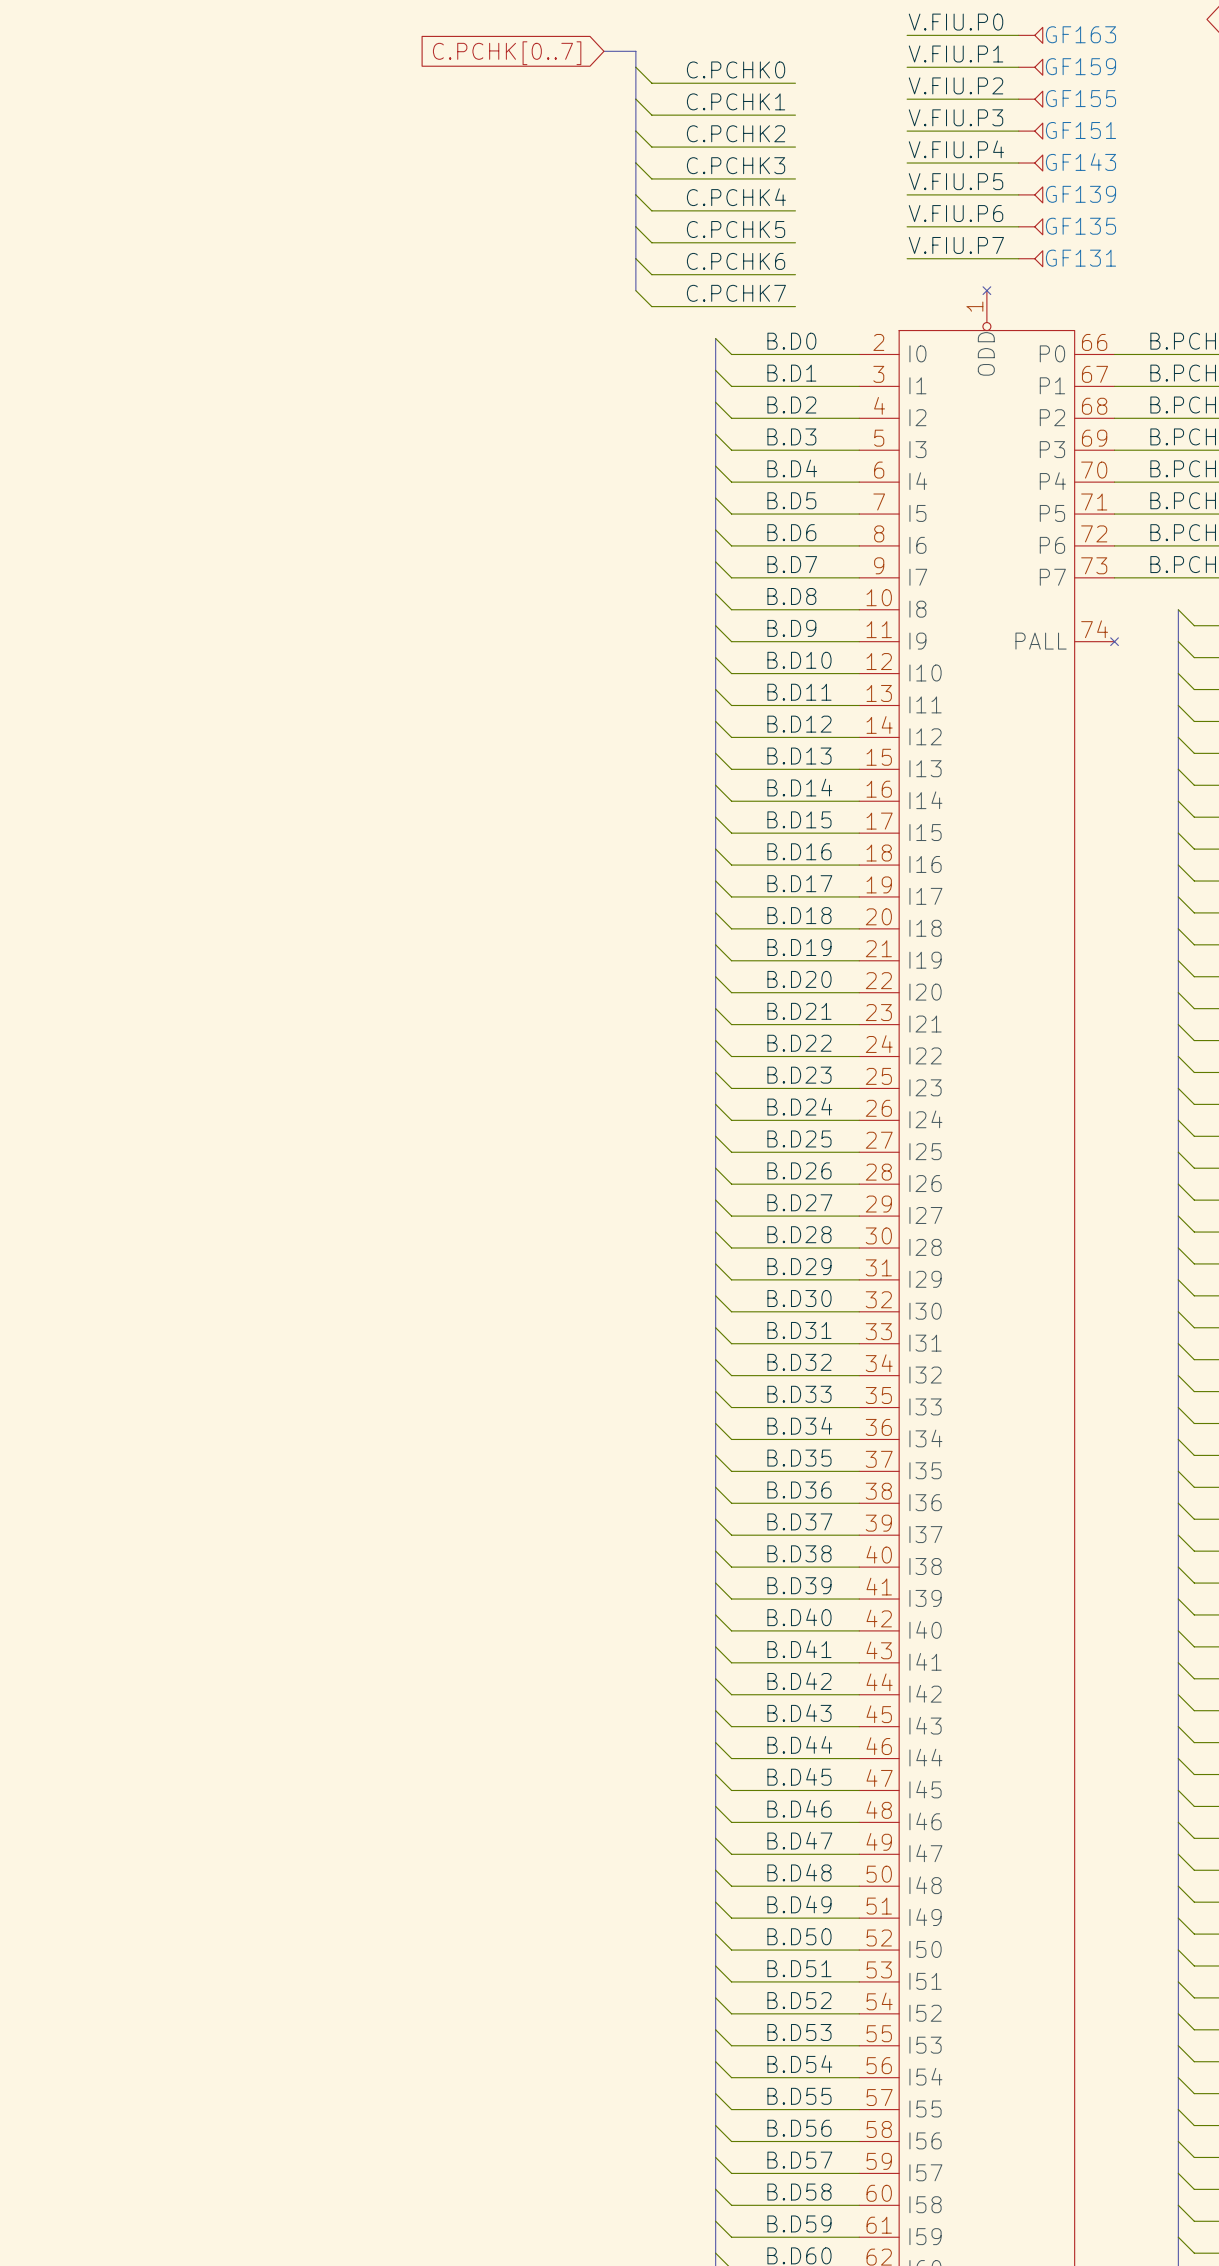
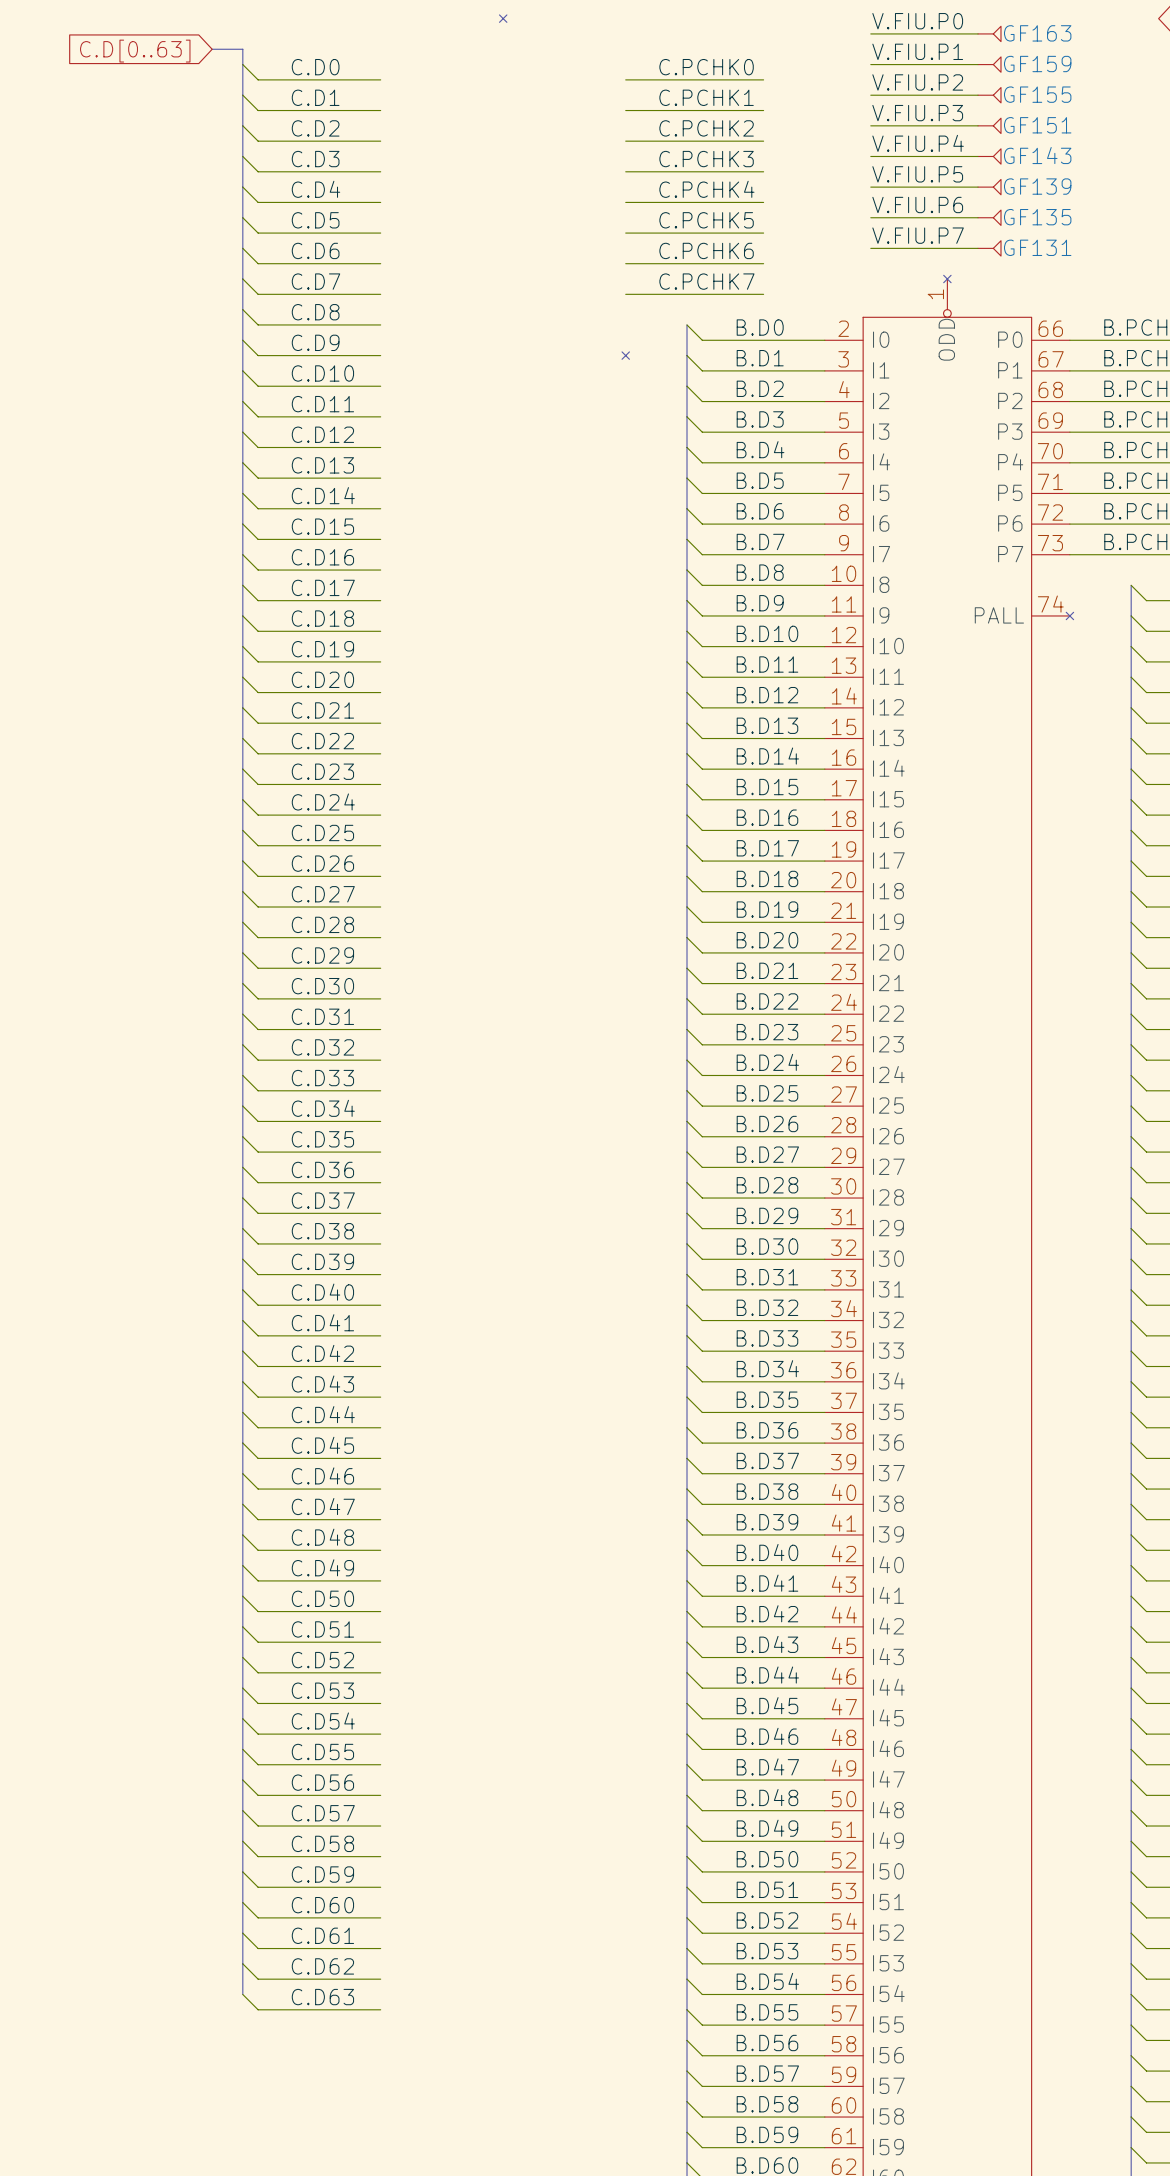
no-connect mark: none -> (503, 18)
bus: none -> (212, 49) (242, 49) (242, 1994)
bus: (603, 51) (635, 51) (635, 290) -> none
global label: none -> C.D[0..63] (135, 51)
global label: C.PCHK[0..7] (507, 53) -> none
wire: none -> (242, 64) (258, 79) (380, 79)
wire: (635, 67) (651, 83) -> none
label: none -> C.D0 (315, 67)
wire: none -> (242, 95) (258, 110) (380, 110)
wire: (635, 99) (651, 115) -> none
label: none -> C.D1 (315, 97)
wire: none -> (242, 125) (258, 141) (380, 141)
wire: (635, 131) (651, 147) -> none
label: none -> C.D2 (315, 128)
wire: none -> (242, 156) (258, 171) (380, 171)
wire: (635, 163) (651, 178) -> none
label: none -> C.D3 (315, 159)
wire: none -> (242, 187) (258, 202) (380, 202)
wire: (635, 194) (651, 210) -> none
label: none -> C.D4 (315, 189)
wire: none -> (242, 217) (258, 233) (380, 233)
wire: (635, 226) (651, 242) -> none
label: none -> C.D5 (315, 220)
wire: none -> (242, 248) (258, 263) (380, 263)
wire: (635, 258) (651, 274) -> none
label: none -> C.D6 (315, 250)
wire: none -> (242, 279) (258, 294) (380, 294)
wire: (635, 290) (651, 306) -> none
label: none -> C.D7 (315, 281)
wire: none -> (242, 309) (258, 324) (380, 324)
label: none -> C.D8 (315, 312)
wire: none -> (242, 340) (258, 355) (380, 355)
label: none -> C.D9 (315, 342)
no-connect mark: none -> (625, 355)
wire: none -> (242, 370) (258, 386) (380, 386)
label: none -> C.D10 (322, 373)
wire: none -> (242, 401) (258, 416) (380, 416)
label: none -> C.D11 (322, 404)
wire: none -> (242, 432) (258, 447) (380, 447)
label: none -> C.D12 (322, 434)
wire: none -> (242, 462) (258, 478) (380, 478)
label: none -> C.D13 (322, 465)
wire: none -> (242, 493) (258, 508) (380, 508)
label: none -> C.D14 (323, 495)
wire: none -> (242, 524) (258, 539) (380, 539)
label: none -> C.D15 (322, 526)
wire: none -> (242, 554) (258, 570) (380, 570)
label: none -> C.D16 (322, 557)
wire: none -> (242, 585) (258, 600) (380, 600)
label: none -> C.D17 (323, 587)
wire: none -> (242, 615) (258, 631) (380, 631)
label: none -> C.D18 (322, 618)
wire: none -> (242, 646) (258, 661) (380, 661)
label: none -> C.D19 (322, 649)
wire: none -> (242, 677) (258, 692) (380, 692)
label: none -> C.D20 (322, 679)
wire: none -> (242, 707) (258, 723) (380, 723)
label: none -> C.D21 (322, 710)
wire: none -> (242, 738) (258, 753) (380, 753)
label: none -> C.D22 (322, 741)
wire: none -> (242, 769) (258, 784) (380, 784)
label: none -> C.D23 (322, 771)
wire: none -> (242, 799) (258, 815) (380, 815)
label: none -> C.D24 (323, 801)
wire: none -> (242, 830) (258, 845) (380, 845)
label: none -> C.D25 (322, 832)
wire: none -> (242, 861) (258, 876) (380, 876)
label: none -> C.D26 (322, 863)
wire: none -> (242, 891) (258, 907) (380, 907)
label: none -> C.D27 (323, 894)
wire: none -> (242, 922) (258, 937) (380, 937)
label: none -> C.D28 (322, 924)
wire: none -> (242, 952) (258, 968) (380, 968)
label: none -> C.D29 (322, 955)
wire: none -> (242, 983) (258, 998) (380, 998)
label: none -> C.D30 (322, 986)
wire: none -> (242, 1014) (258, 1029) (380, 1029)
label: none -> C.D31 (322, 1016)
wire: none -> (242, 1044) (258, 1060) (380, 1060)
label: none -> C.D32 (322, 1047)
wire: none -> (242, 1075) (258, 1090) (380, 1090)
label: none -> C.D33 (322, 1078)
wire: none -> (242, 1106) (258, 1121) (380, 1121)
label: none -> C.D34 (323, 1108)
wire: none -> (242, 1136) (258, 1152) (380, 1152)
label: none -> C.D35 (322, 1139)
wire: none -> (242, 1167) (258, 1182) (380, 1182)
label: none -> C.D36 (322, 1169)
wire: none -> (242, 1198) (258, 1213) (380, 1213)
label: none -> C.D37 (323, 1200)
wire: none -> (242, 1228) (258, 1243) (380, 1243)
label: none -> C.D38 (322, 1231)
wire: none -> (242, 1259) (258, 1274) (380, 1274)
label: none -> C.D39 (322, 1261)
wire: none -> (242, 1289) (258, 1305) (380, 1305)
label: none -> C.D40 (322, 1292)
wire: none -> (242, 1320) (258, 1335) (380, 1335)
label: none -> C.D41 (322, 1322)
wire: none -> (242, 1351) (258, 1366) (380, 1366)
label: none -> C.D42 (322, 1353)
wire: none -> (242, 1381) (258, 1397) (380, 1397)
label: none -> C.D43 (322, 1384)
wire: none -> (242, 1412) (258, 1427) (380, 1427)
label: none -> C.D44 (323, 1414)
wire: none -> (242, 1443) (258, 1458) (380, 1458)
label: none -> C.D45 (322, 1445)
wire: none -> (242, 1473) (258, 1489) (380, 1489)
label: none -> C.D46 (322, 1475)
wire: none -> (242, 1504) (258, 1519) (380, 1519)
label: none -> C.D47 (323, 1506)
wire: none -> (242, 1534) (258, 1550) (380, 1550)
label: none -> C.D48 (322, 1537)
wire: none -> (242, 1565) (258, 1580) (380, 1580)
label: none -> C.D49 (322, 1567)
wire: none -> (242, 1596) (258, 1611) (380, 1611)
label: none -> C.D50 (322, 1598)
wire: none -> (242, 1626) (258, 1642) (380, 1642)
label: none -> C.D51 (322, 1629)
wire: none -> (242, 1657) (258, 1672) (380, 1672)
label: none -> C.D52 (322, 1660)
wire: none -> (242, 1688) (258, 1703) (380, 1703)
label: none -> C.D53 (322, 1690)
wire: none -> (242, 1718) (258, 1734) (380, 1734)
label: none -> C.D54 (323, 1720)
wire: none -> (242, 1749) (258, 1764) (380, 1764)
label: none -> C.D55 (322, 1751)
wire: none -> (242, 1780) (258, 1795) (380, 1795)
label: none -> C.D56 (322, 1782)
wire: none -> (242, 1810) (258, 1826) (380, 1826)
label: none -> C.D57 (323, 1813)
wire: none -> (242, 1841) (258, 1856) (380, 1856)
label: none -> C.D58 (322, 1843)
wire: none -> (242, 1871) (258, 1887) (380, 1887)
label: none -> C.D59 (322, 1874)
wire: none -> (242, 1902) (258, 1917) (380, 1917)
label: none -> C.D60 (322, 1905)
wire: none -> (242, 1933) (258, 1948) (380, 1948)
label: none -> C.D61 (322, 1935)
wire: none -> (242, 1963) (258, 1979) (380, 1979)
label: none -> C.D62 (322, 1966)
wire: none -> (242, 1994) (258, 2009) (380, 2009)
label: none -> C.D63 (322, 1997)

